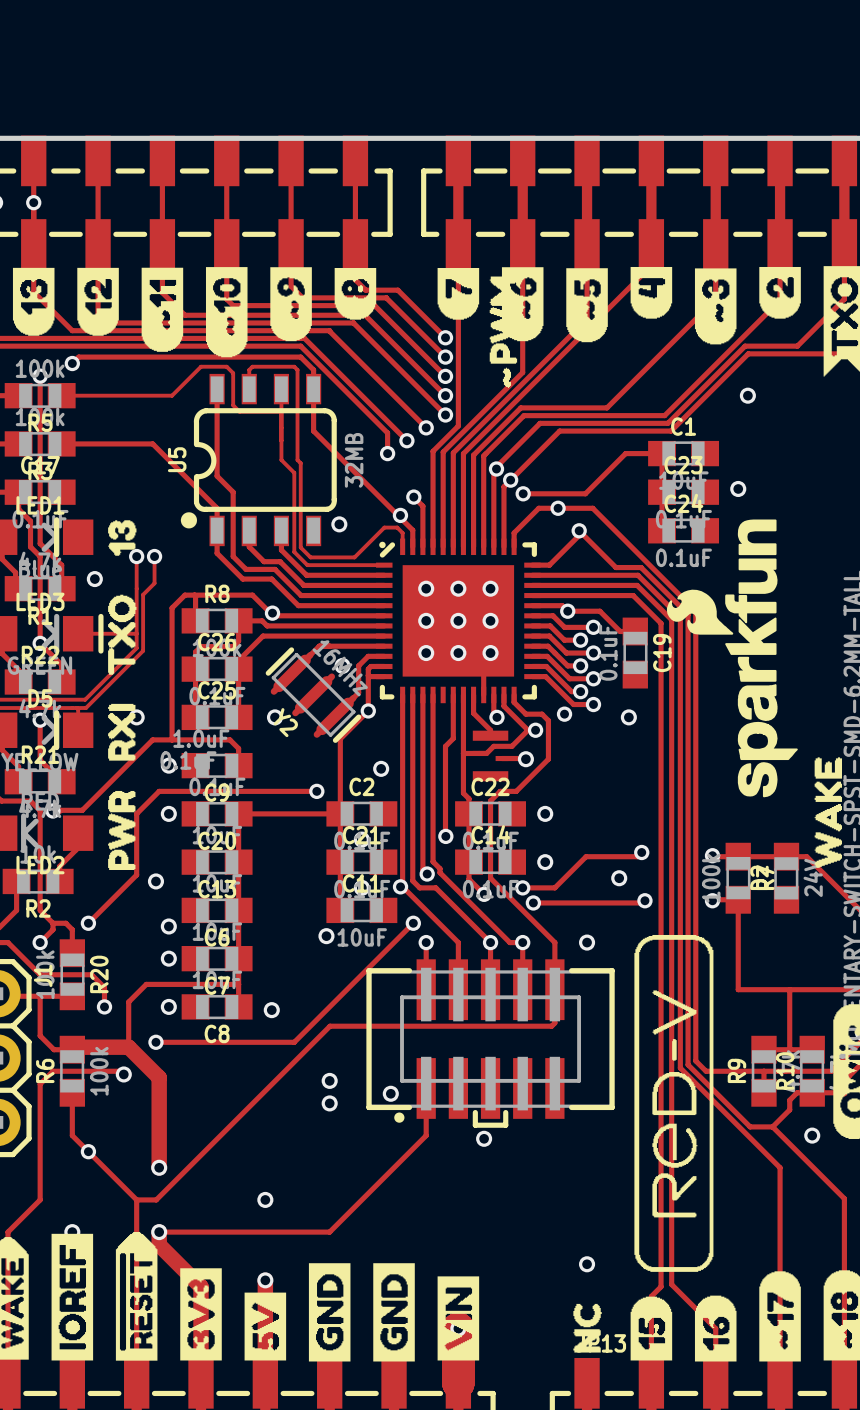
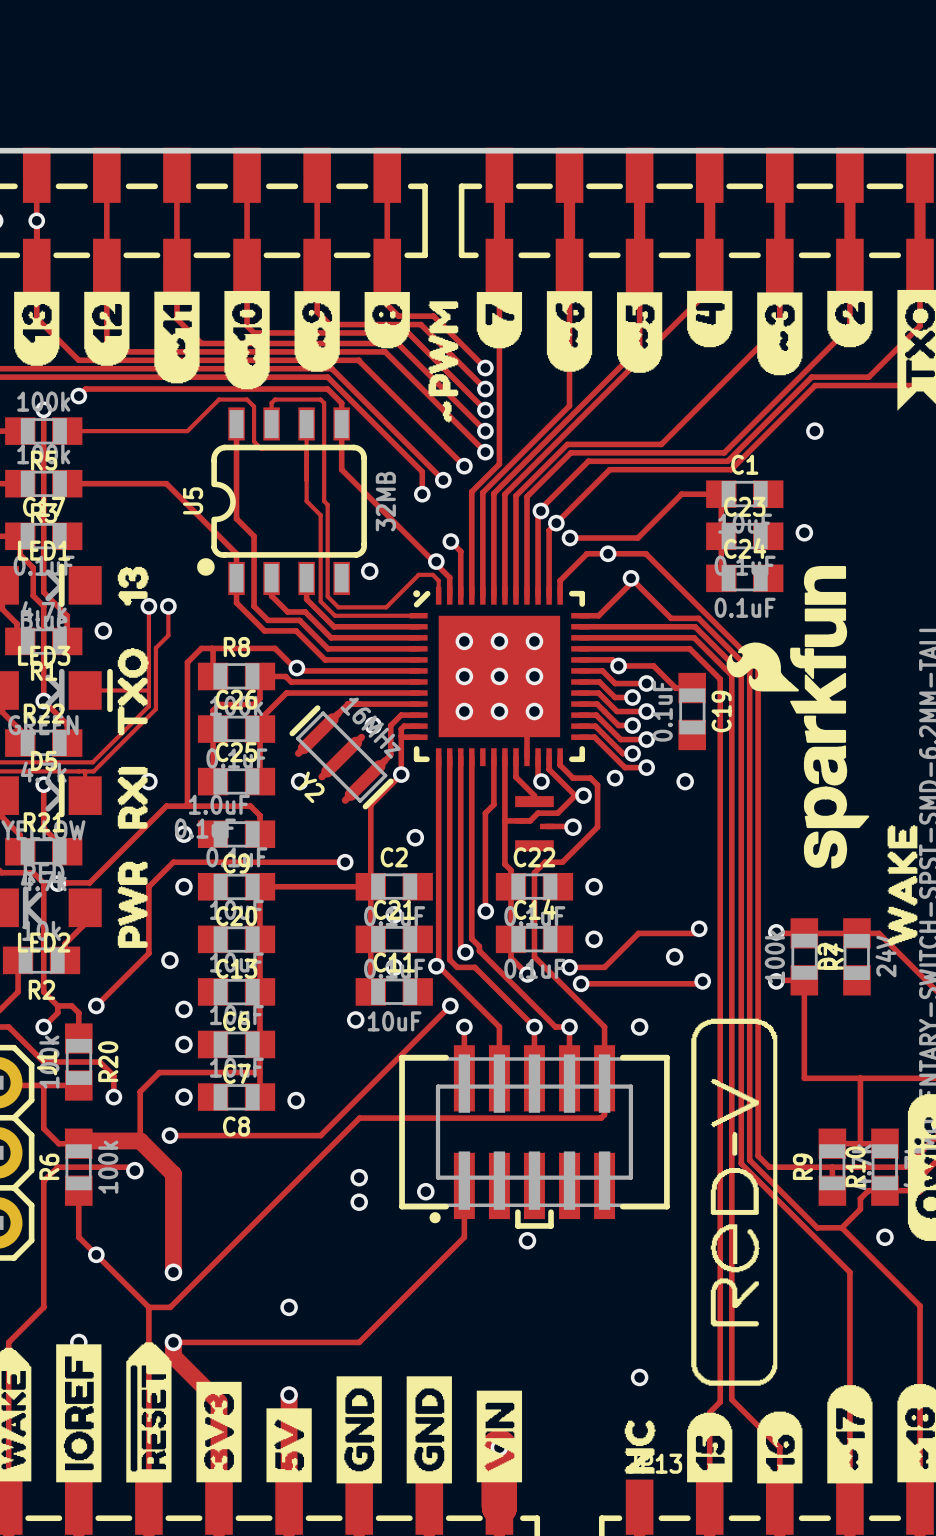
drawing position: (503, 332) -> (443, 362)

